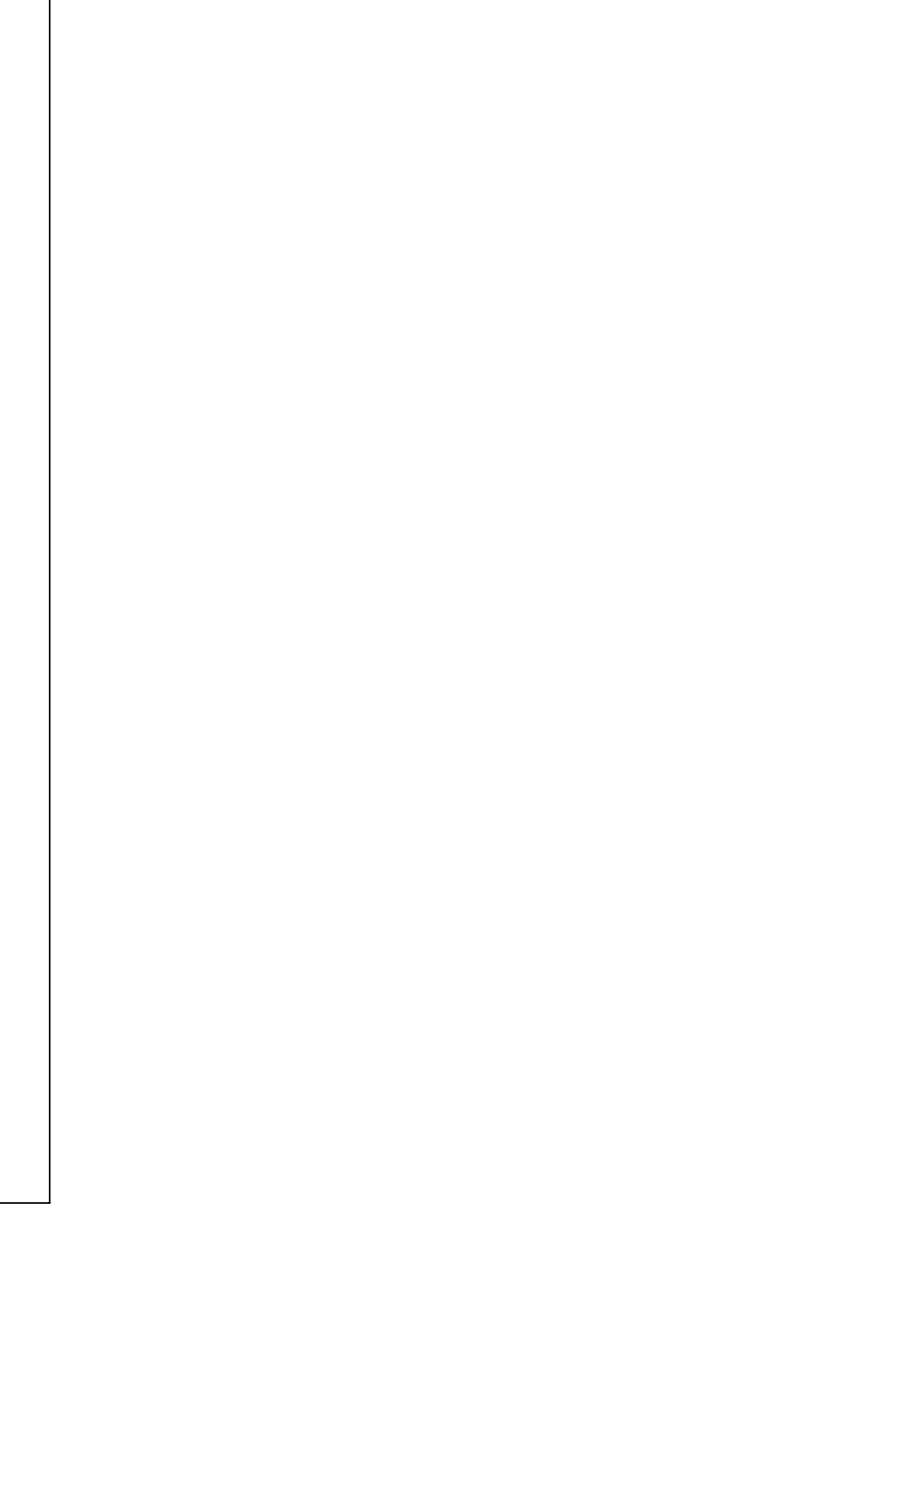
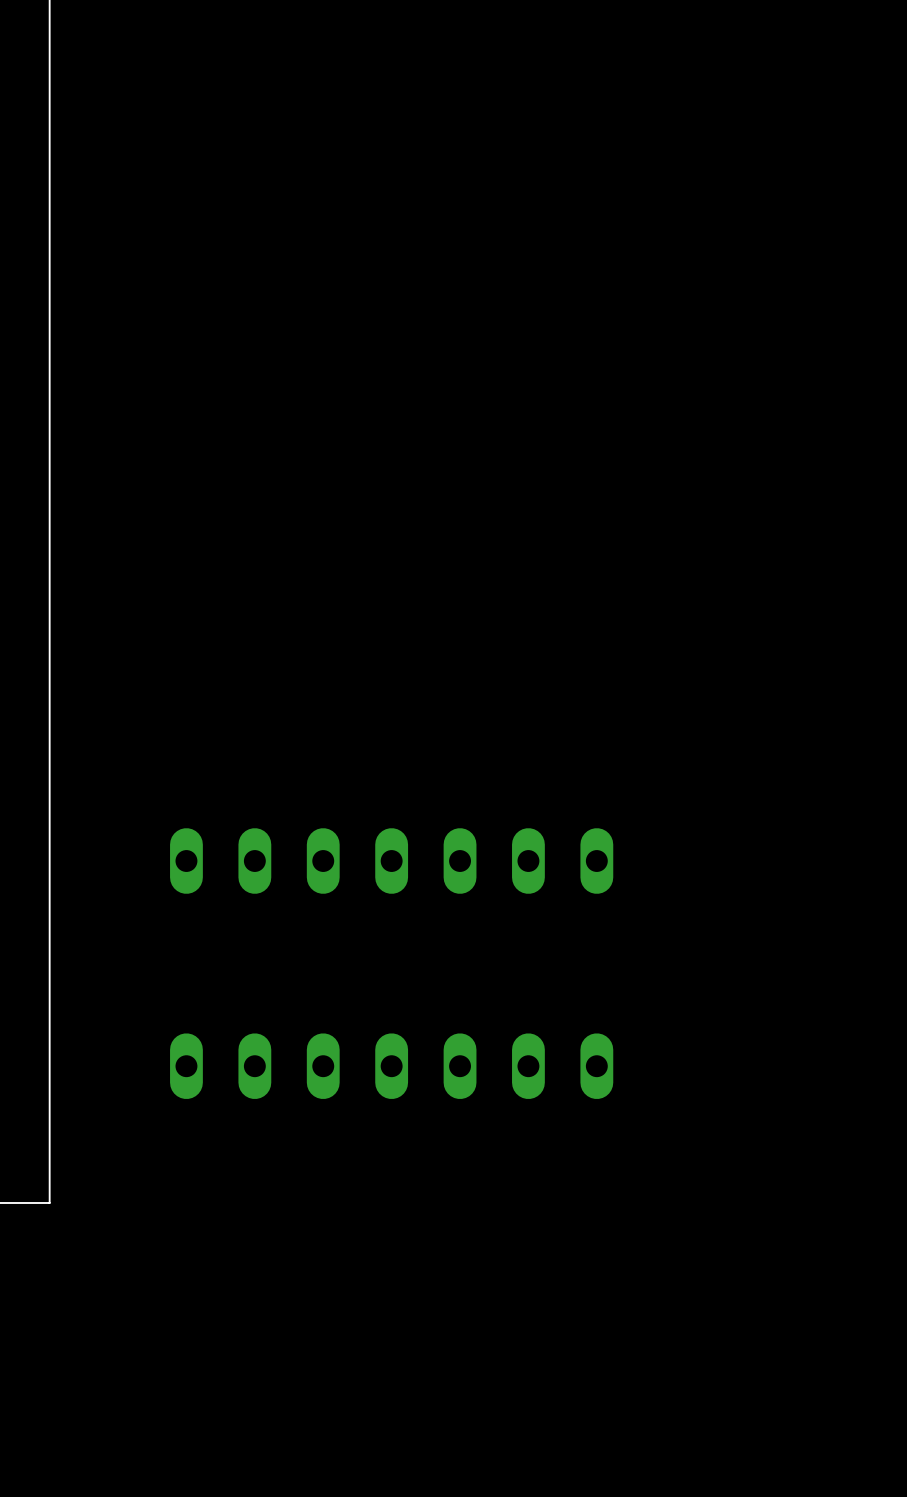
part: none -> (391, 963)

